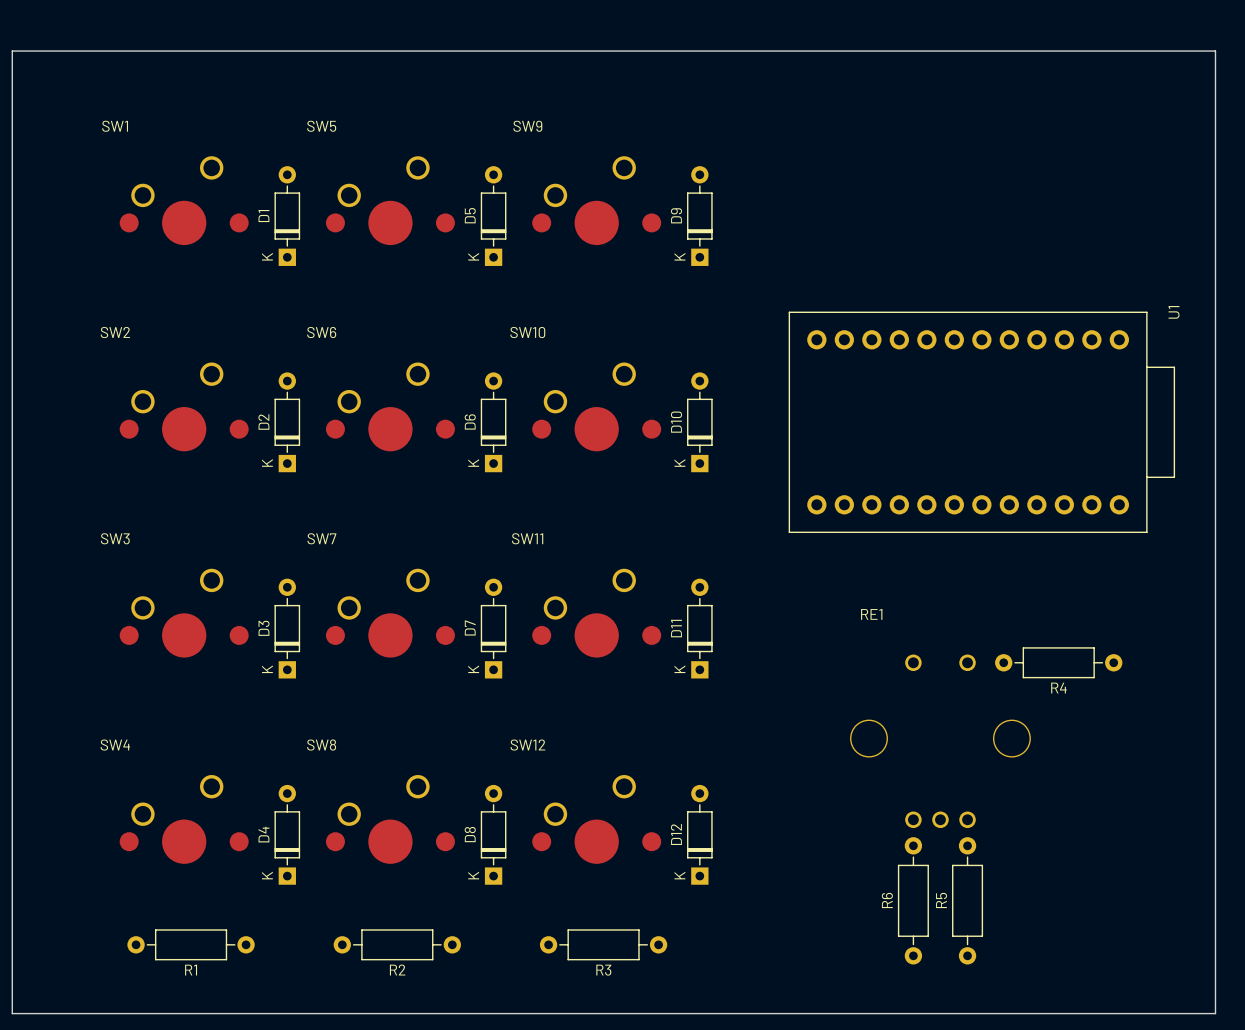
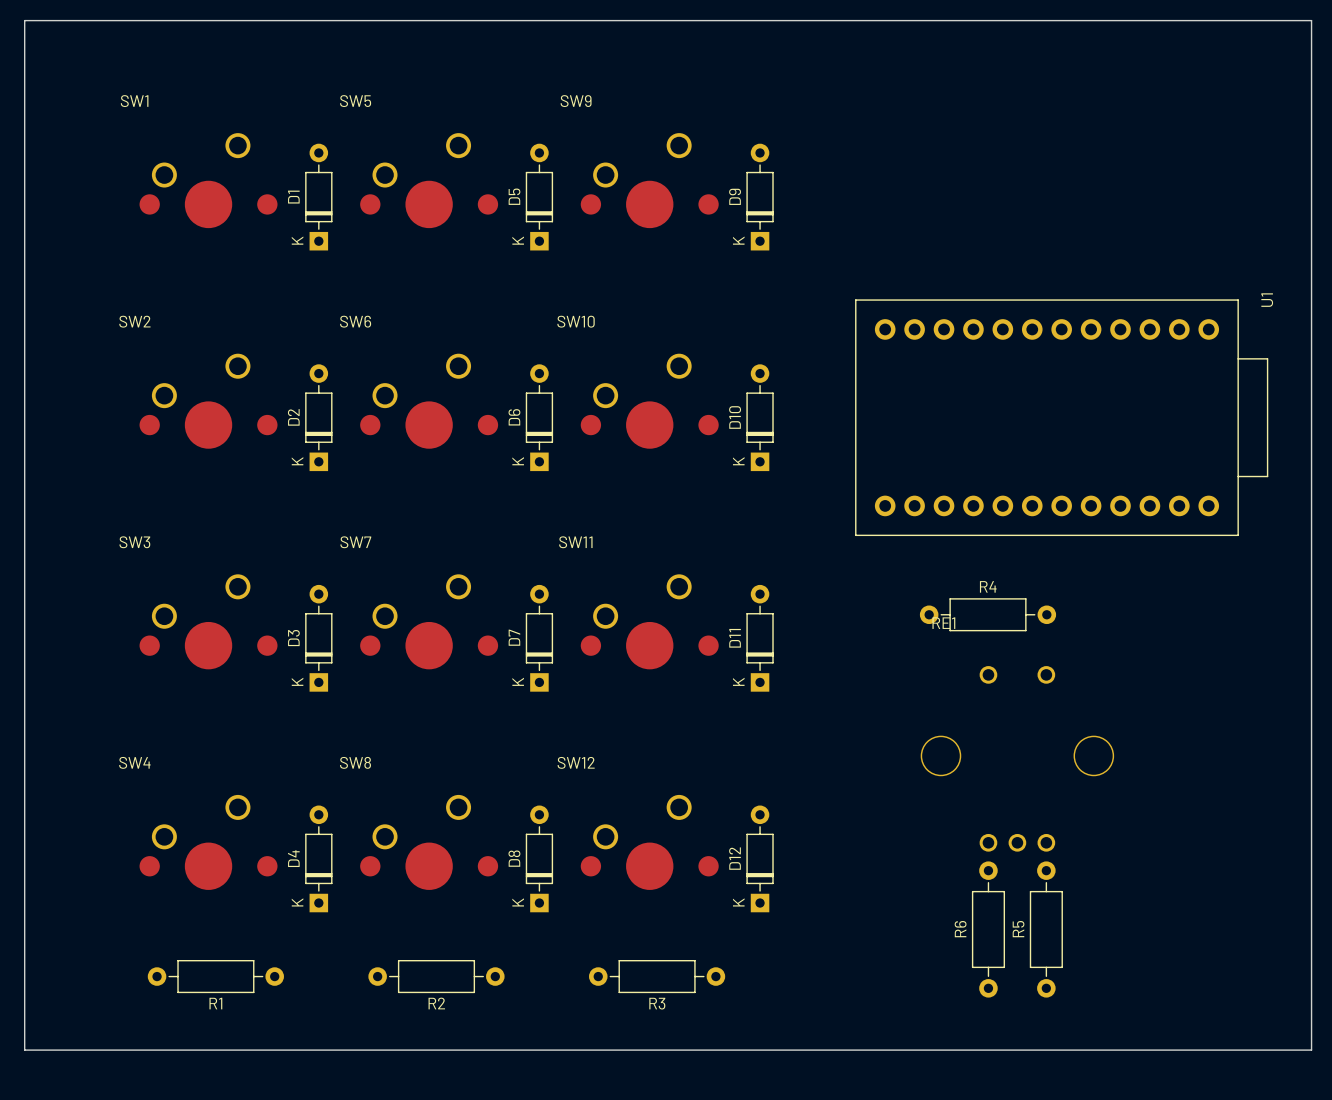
R4 position: (1058, 662) -> (987, 614)
R4 name position: R4 (1058, 688) -> R4 (988, 586)

